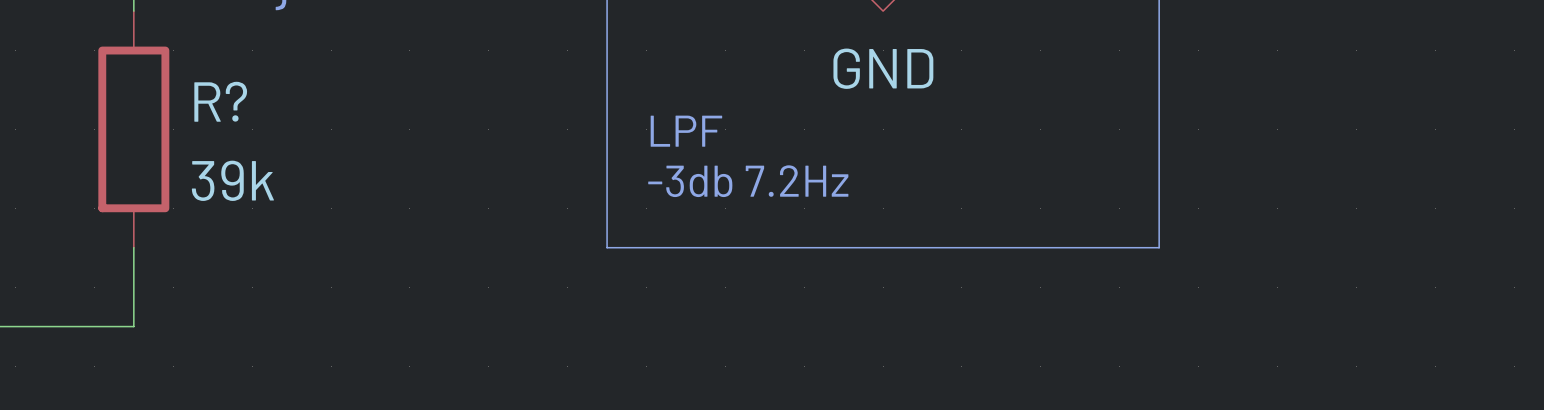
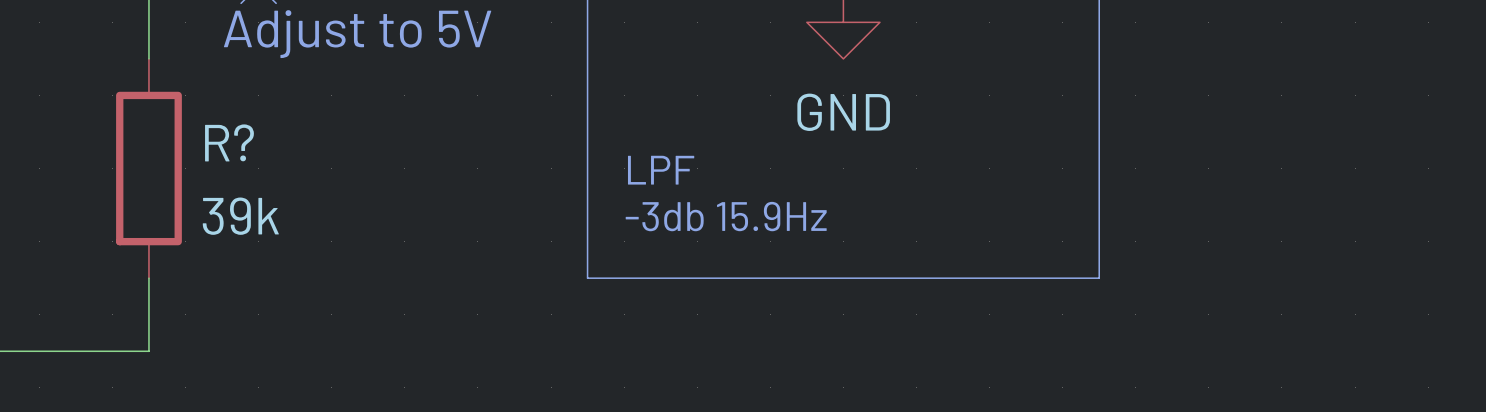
text: -3db 7.2Hz (748, 181) -> -3db 15.9Hz (726, 216)

